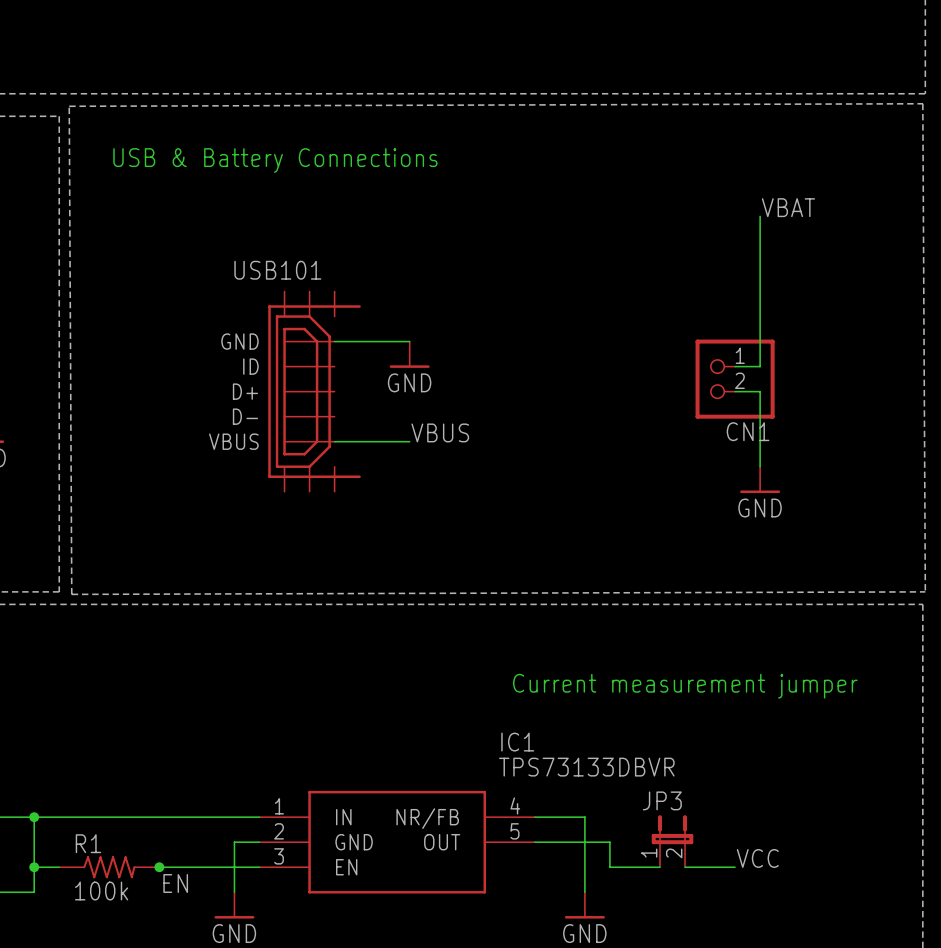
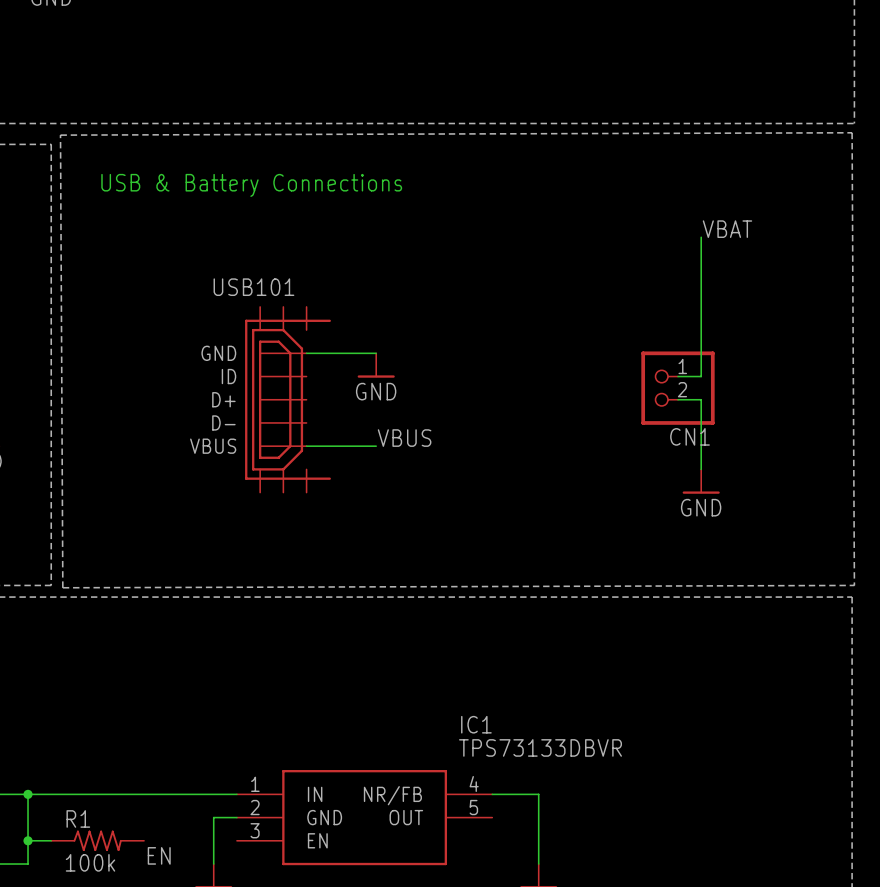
text: Current measurement jumper (685, 686) -> none
JP3: (672, 841) -> none
wire: (534, 842) (609, 842) (609, 867) (659, 867) -> none
label: VCC (757, 858) -> none
wire: (159, 867) (259, 867) -> none
junction: (159, 867) -> none
wire: (685, 867) (735, 867) -> none

